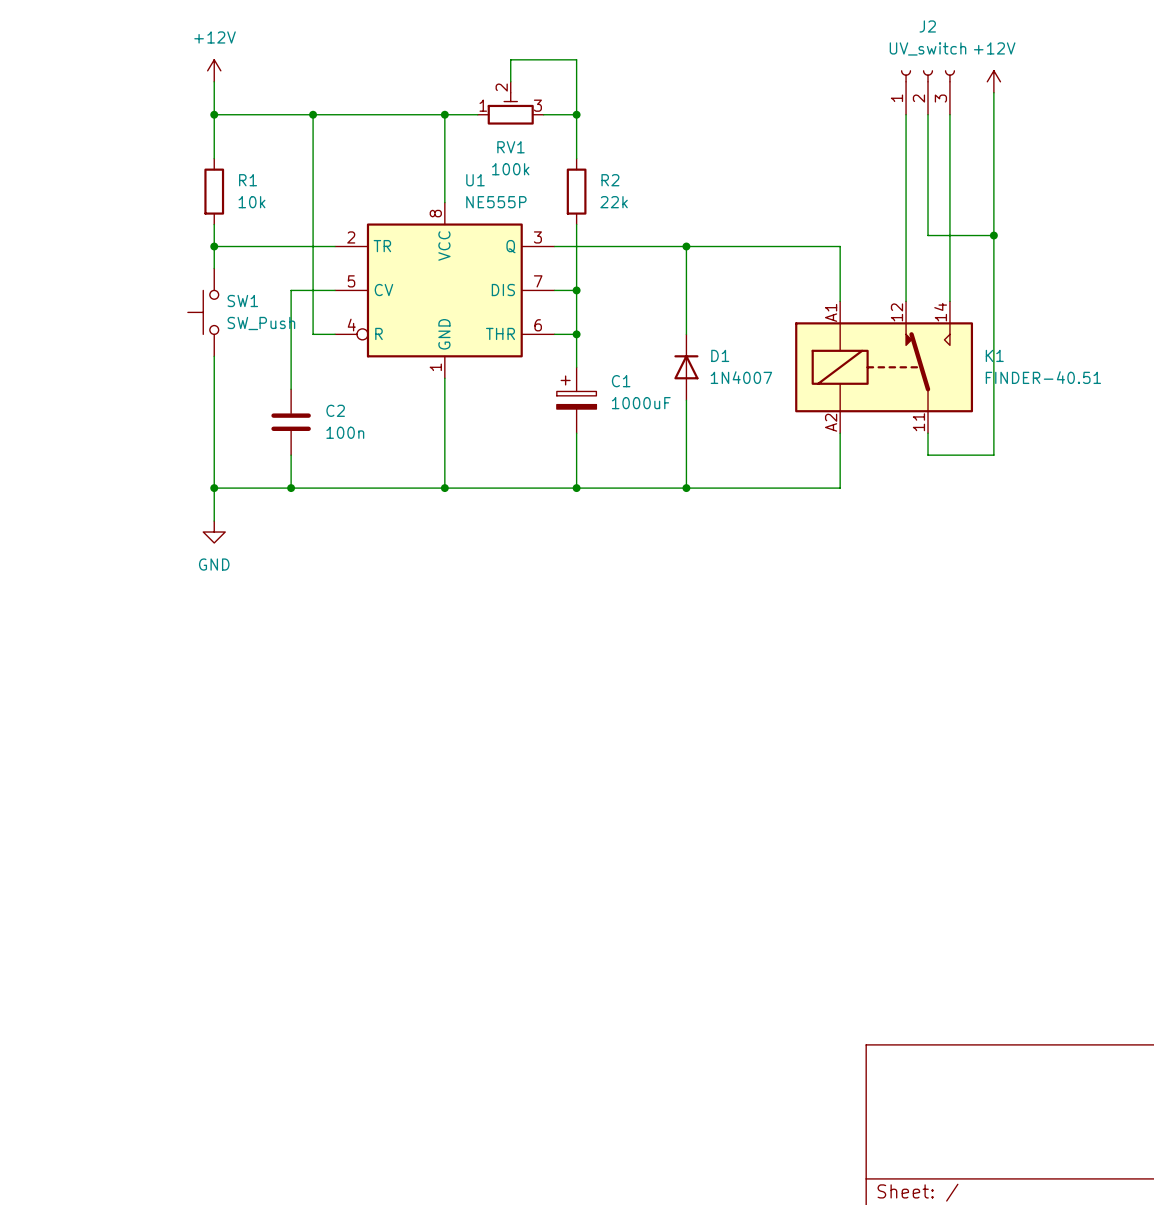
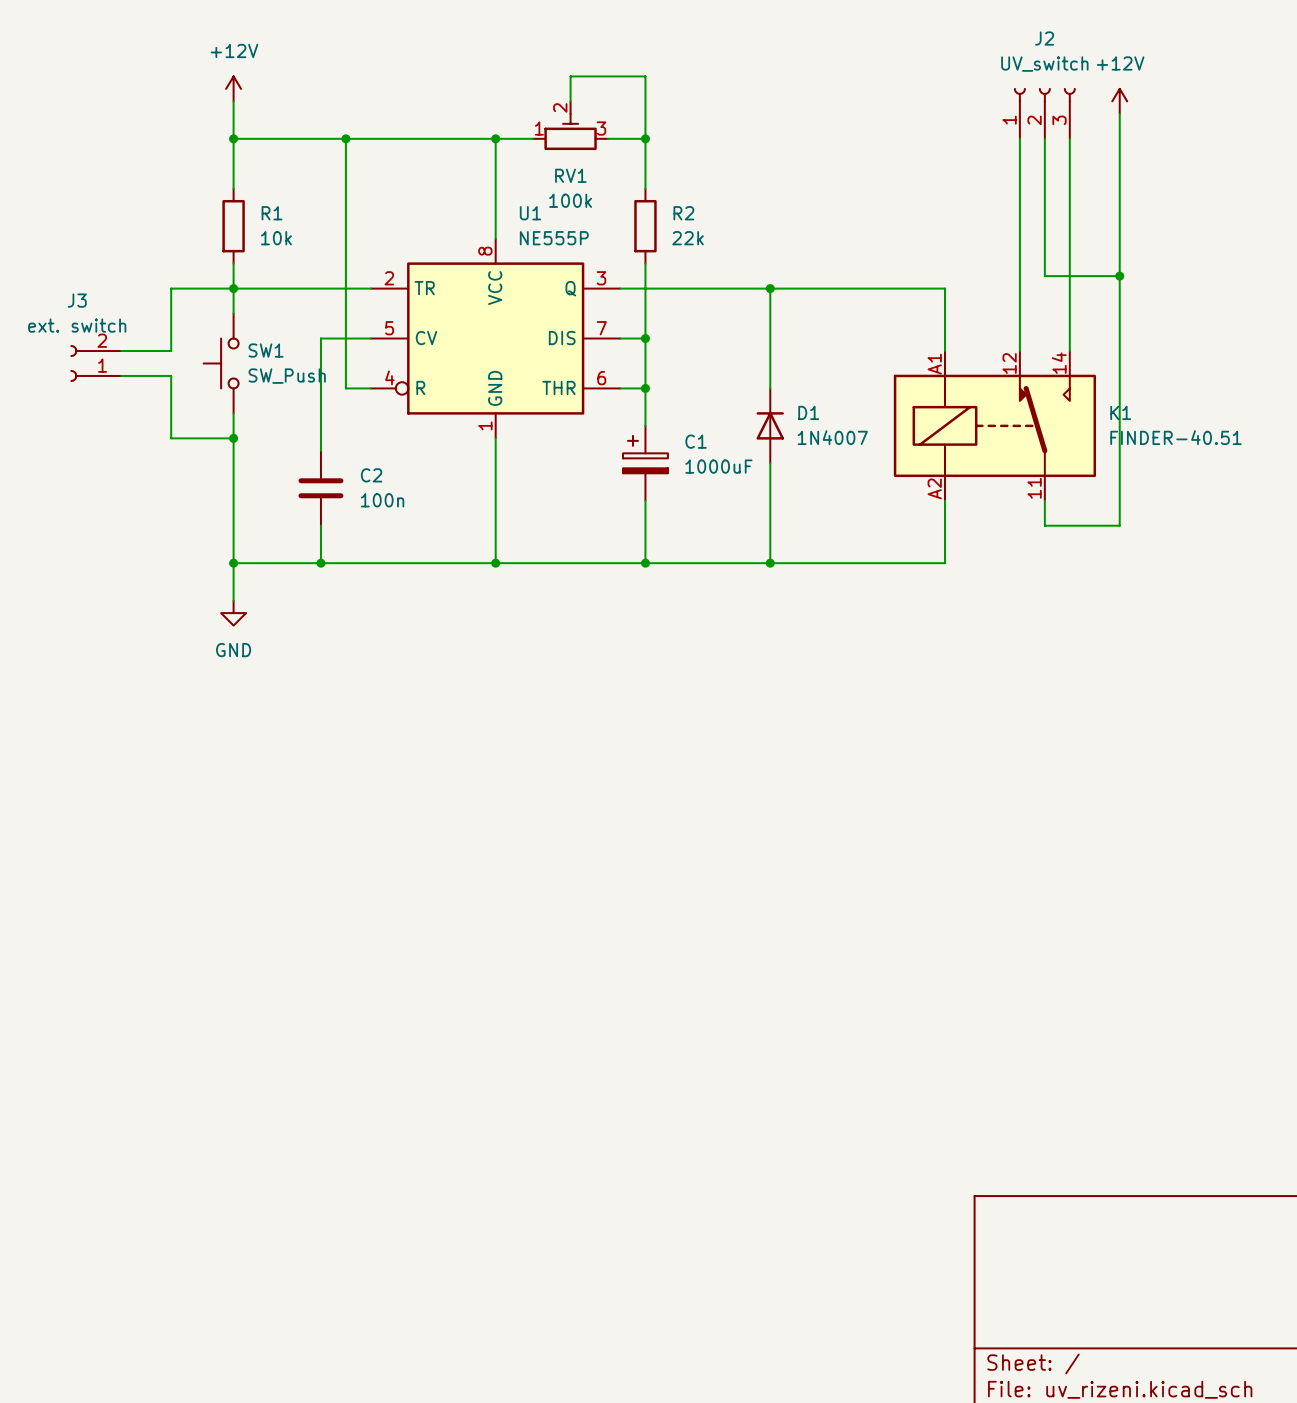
wire: none -> (233, 288) (171, 288) (171, 351) (121, 351)
J3: none -> ext. switch (95, 363)
wire: none -> (121, 375) (171, 375) (171, 438) (233, 438)
junction: none -> (233, 438)

